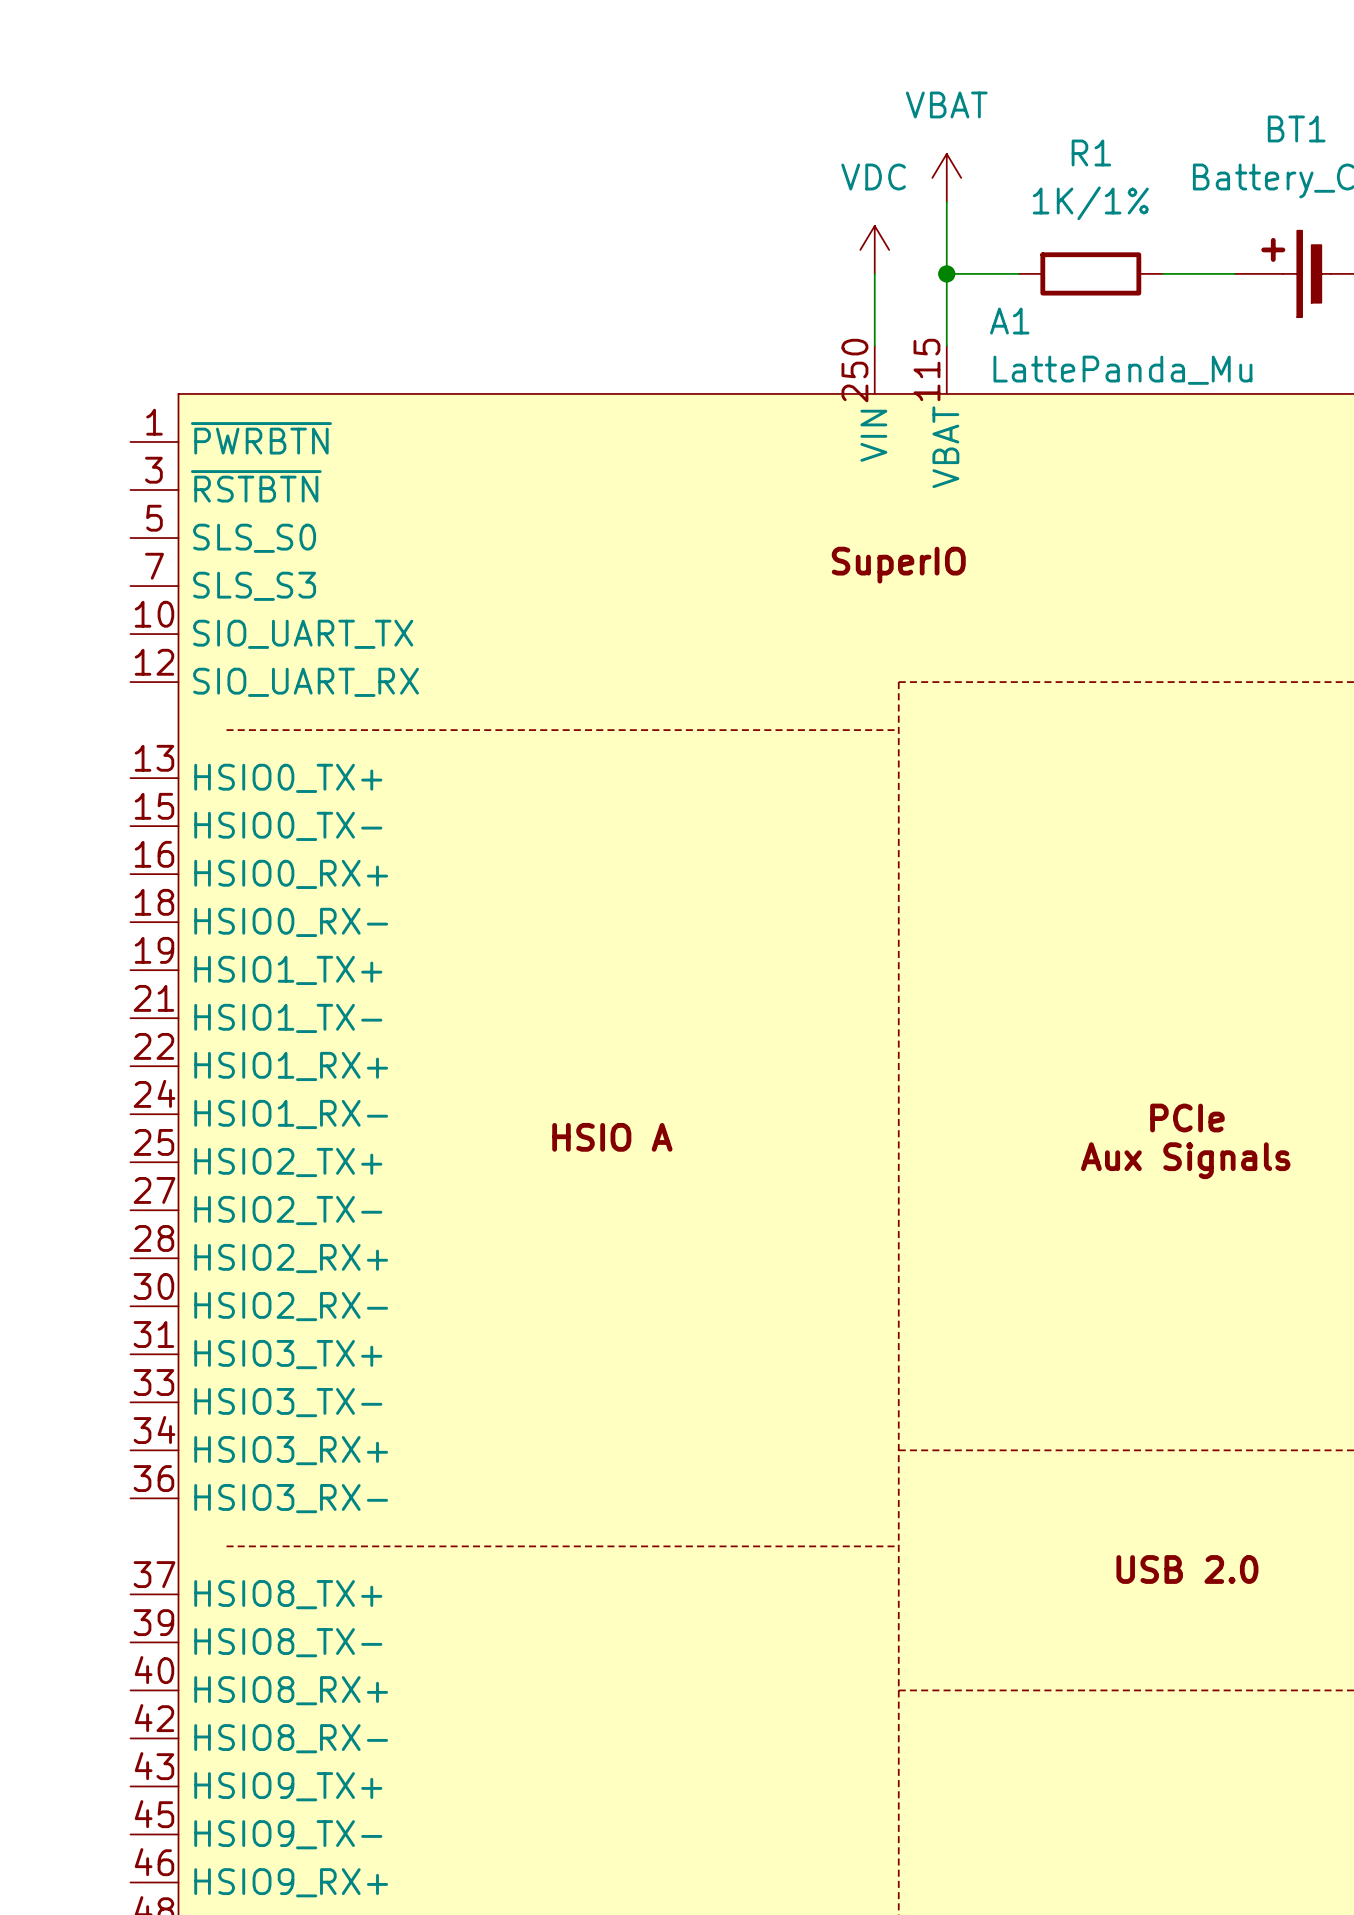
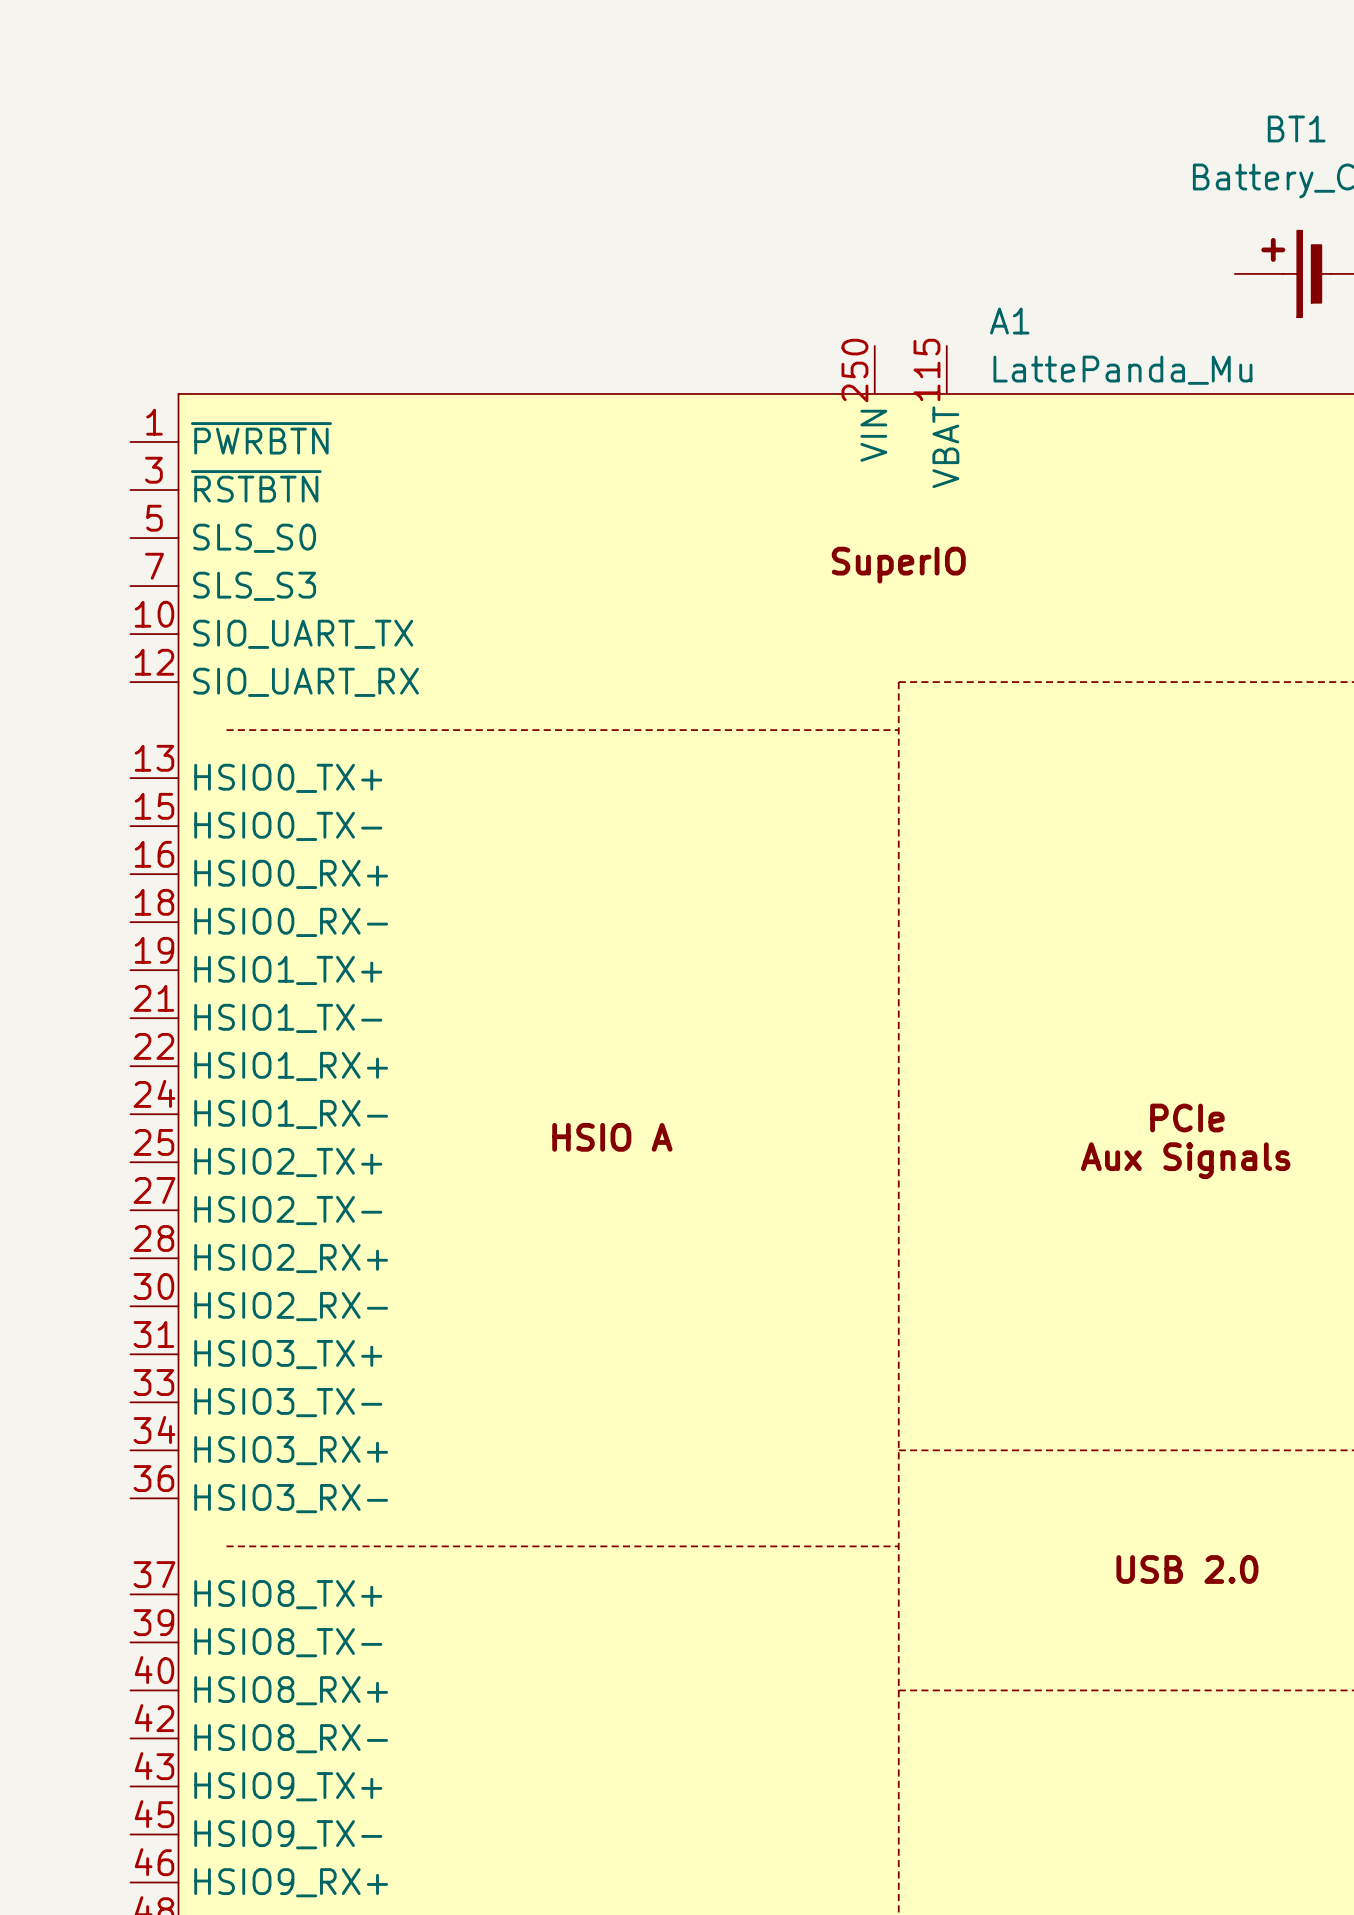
power symbol: VBAT (946, 177) -> none
wire: (946, 201) (946, 345) -> none
power symbol: VDC (874, 249) -> none
wire: (874, 273) (874, 345) -> none
wire: (946, 273) (1018, 273) -> none
junction: (946, 273) -> none
R1: 1K/1% (1090, 273) -> none
wire: (1162, 273) (1234, 273) -> none

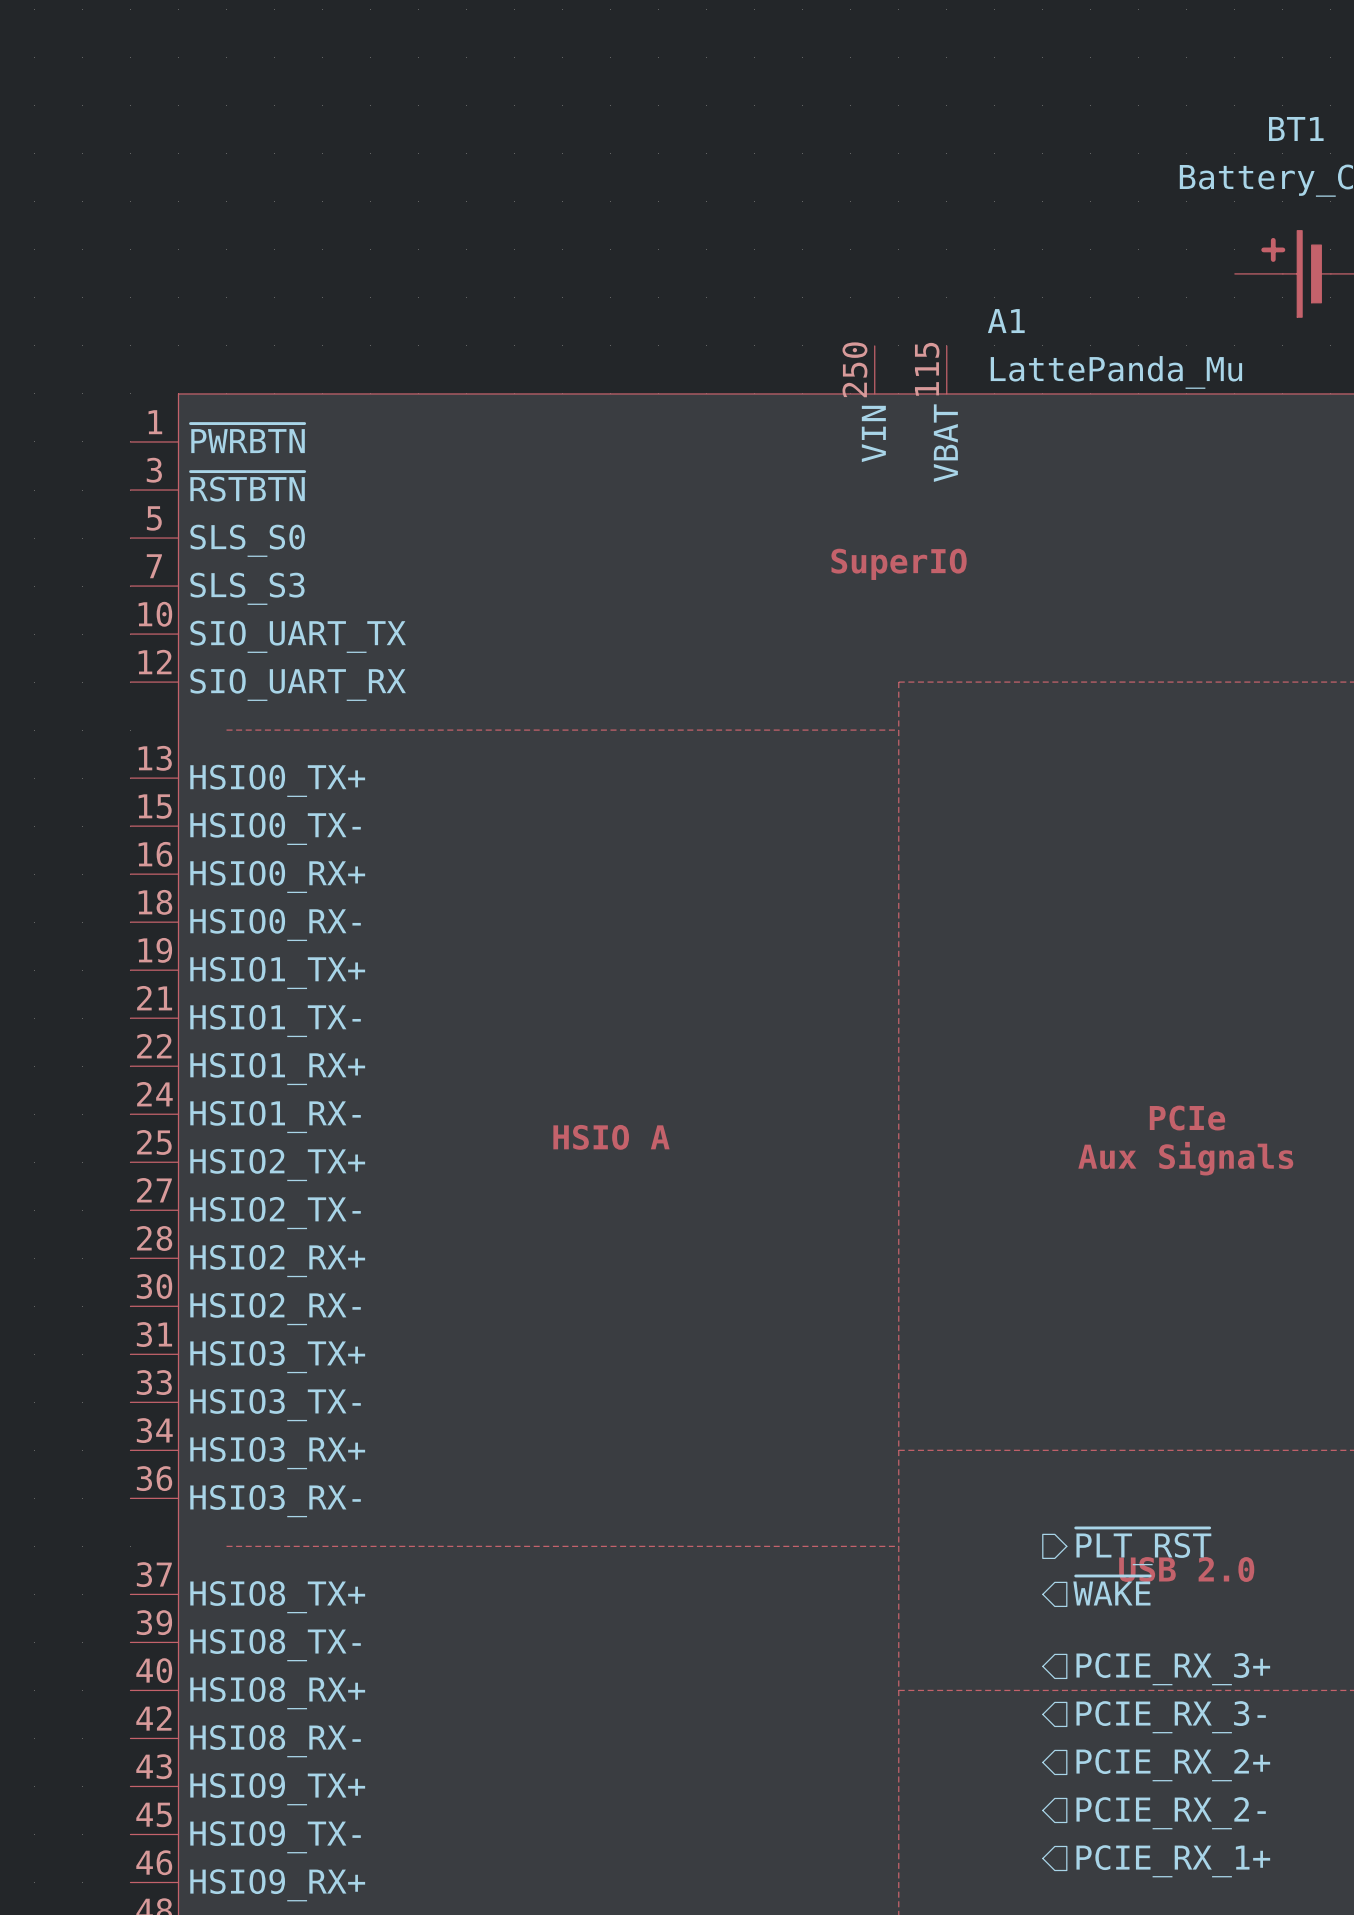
sheet pin: none -> ~{PLT_RST} (1143, 1546)
sheet pin: none -> ~{WAKE} (1111, 1590)
sheet pin: none -> PCIE_RX_3+ (1173, 1669)
sheet pin: none -> PCIE_RX_3- (1171, 1717)
sheet pin: none -> PCIE_RX_2+ (1173, 1765)
sheet pin: none -> PCIE_RX_2- (1171, 1813)
sheet pin: none -> PCIE_RX_1+ (1173, 1861)

